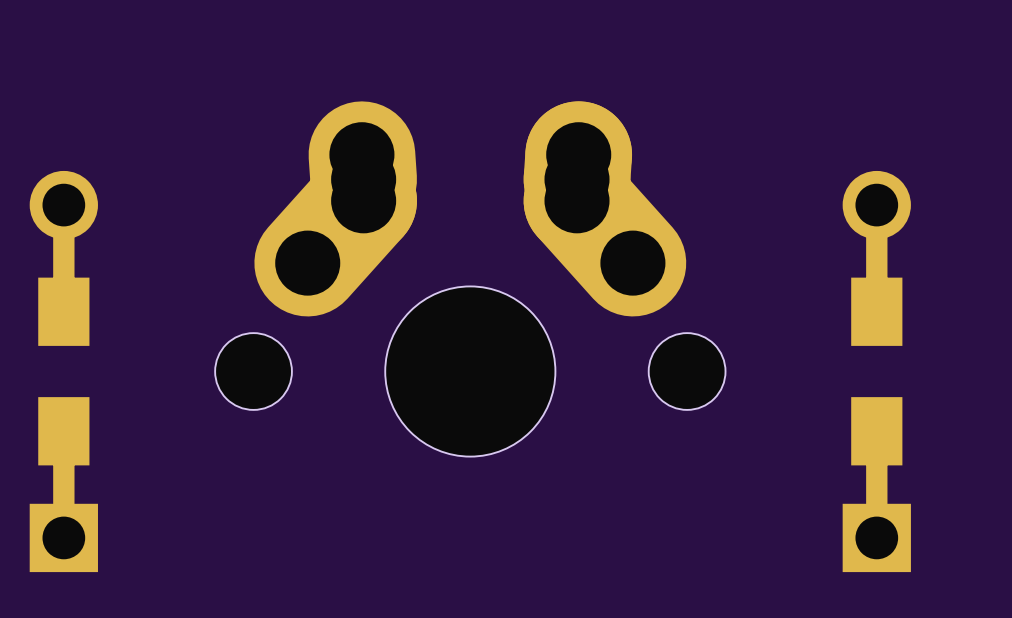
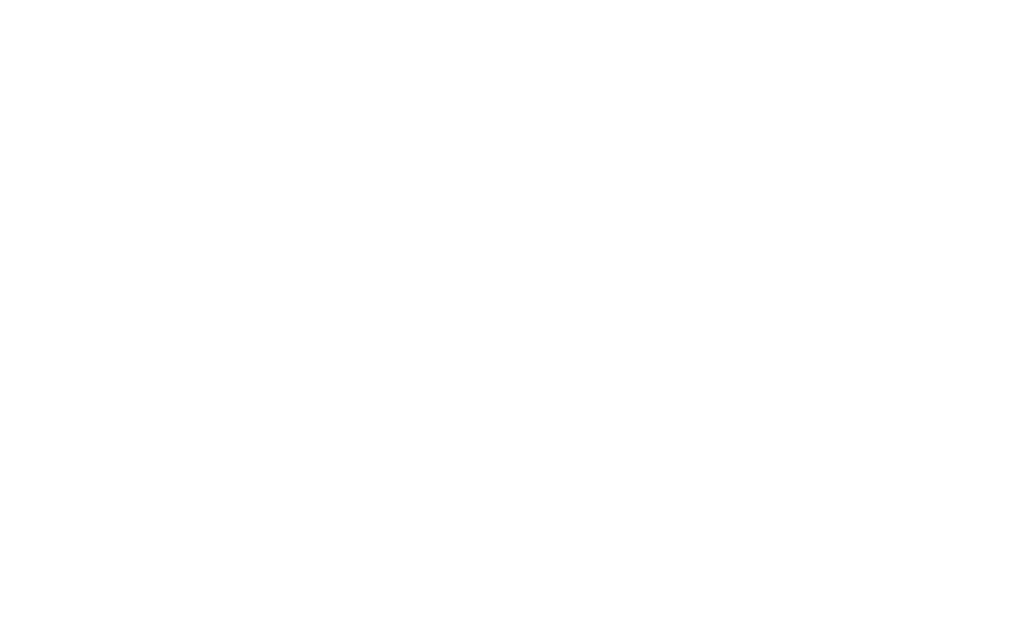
part: (470, 278) -> none
part: (63, 371) -> none
part: (876, 371) -> none

